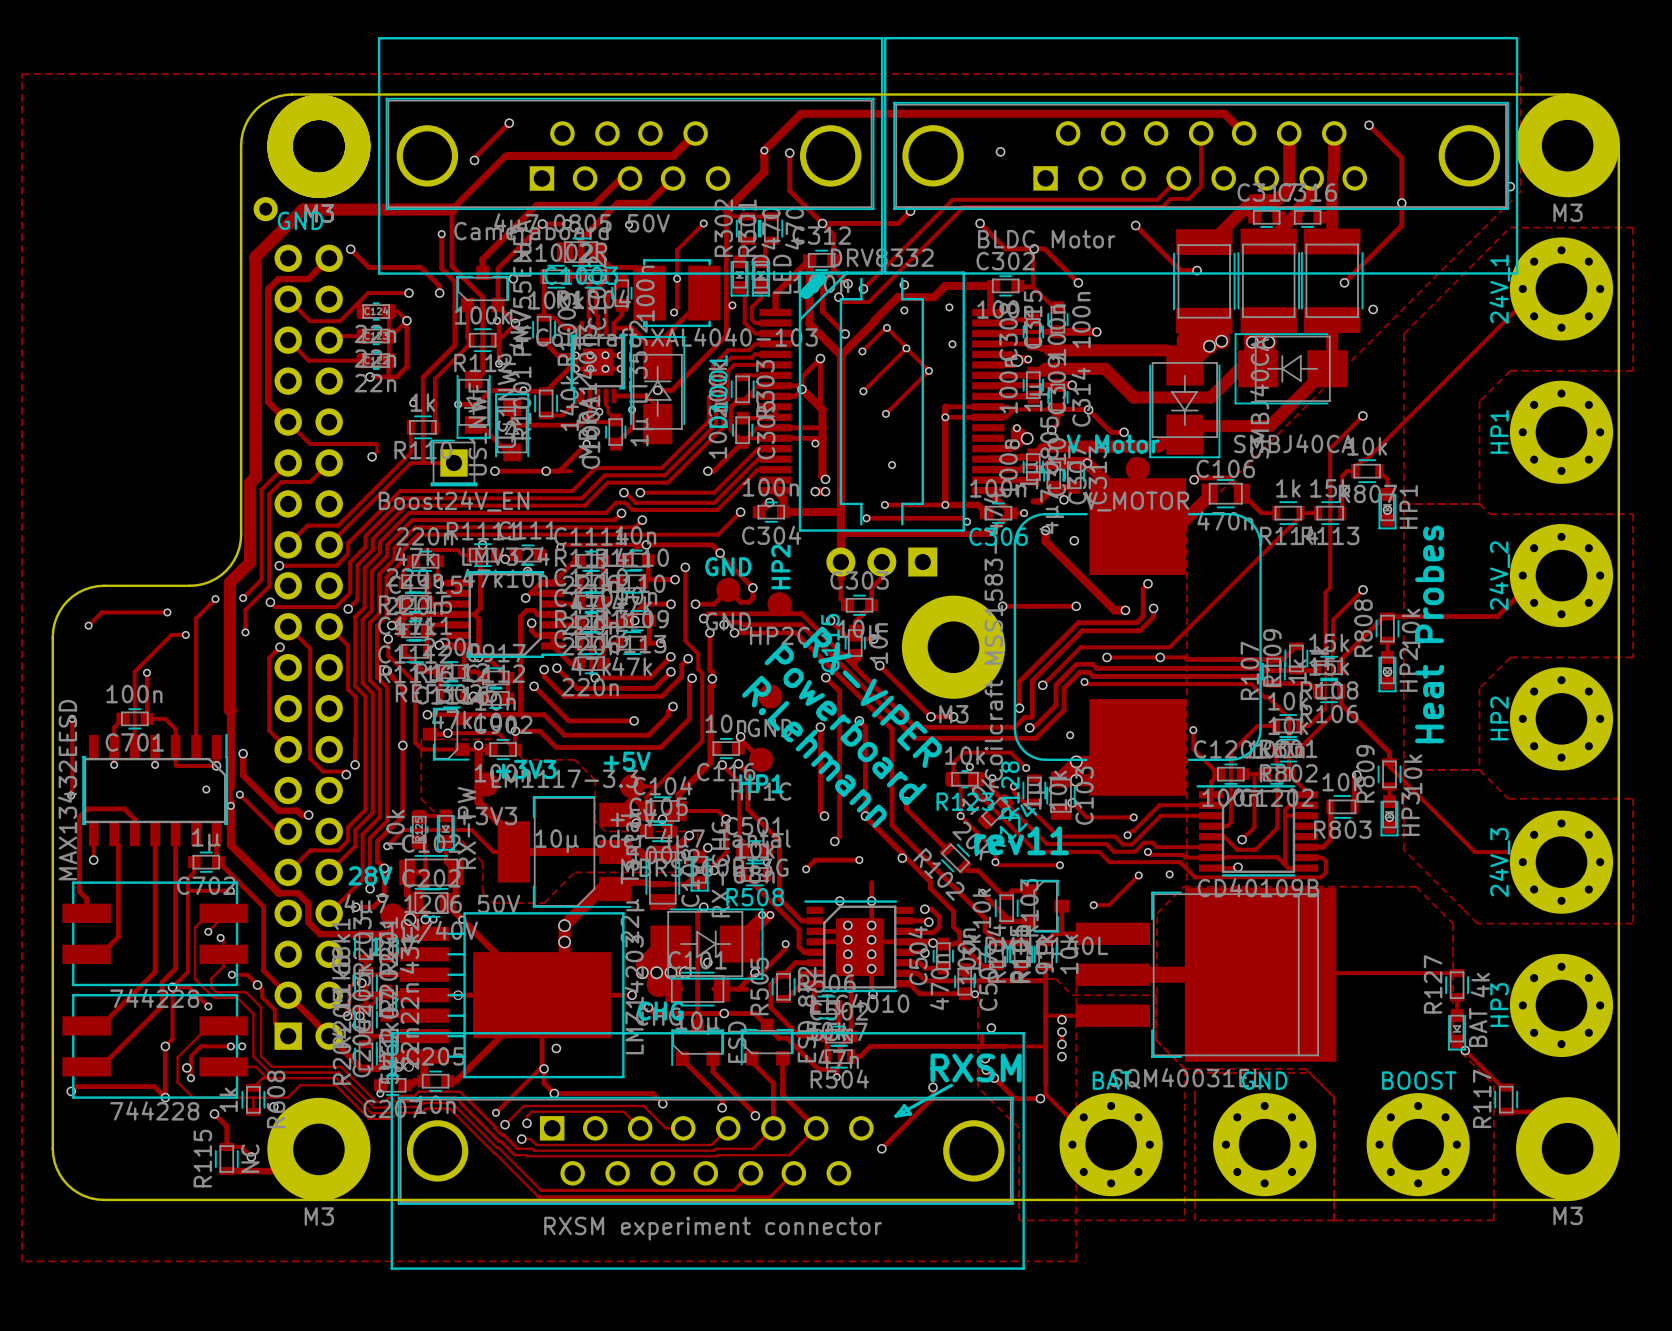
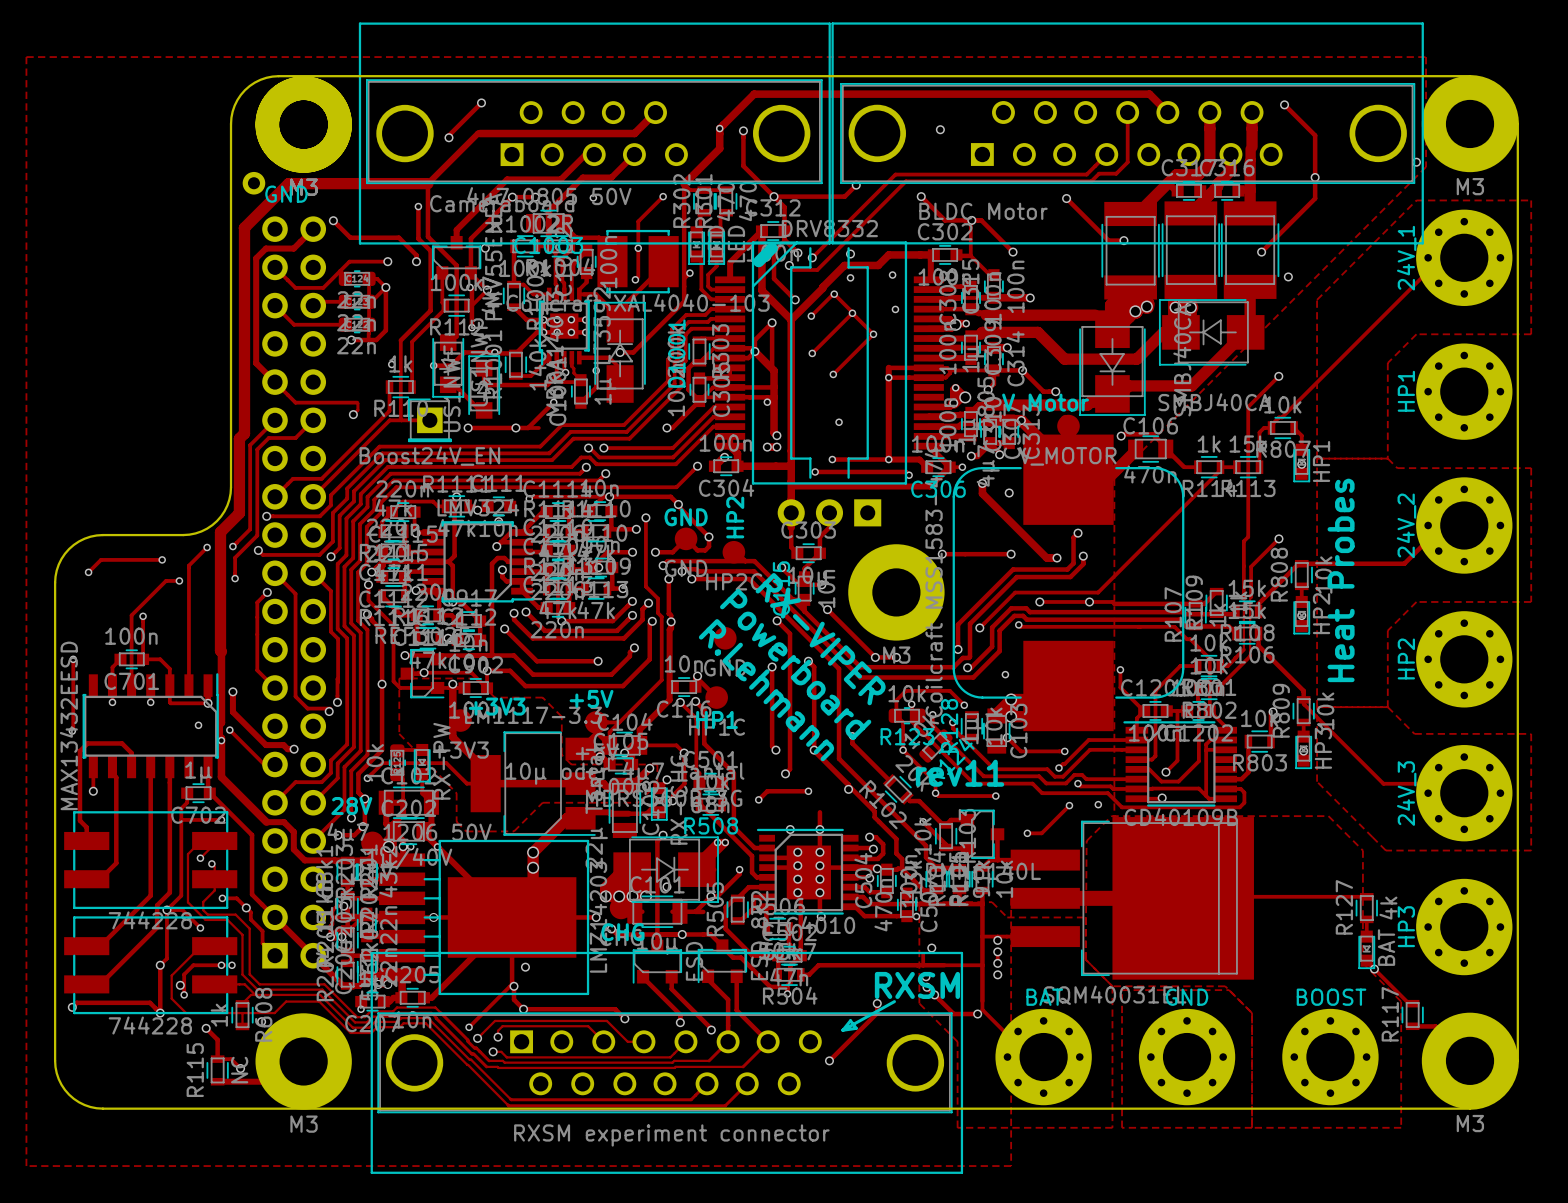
via: none -> (971, 456)

